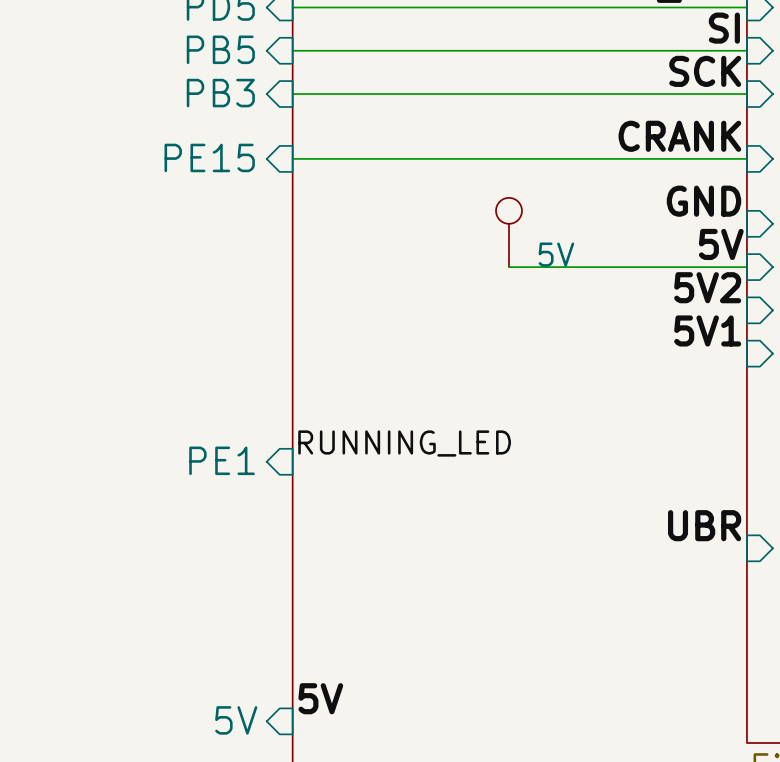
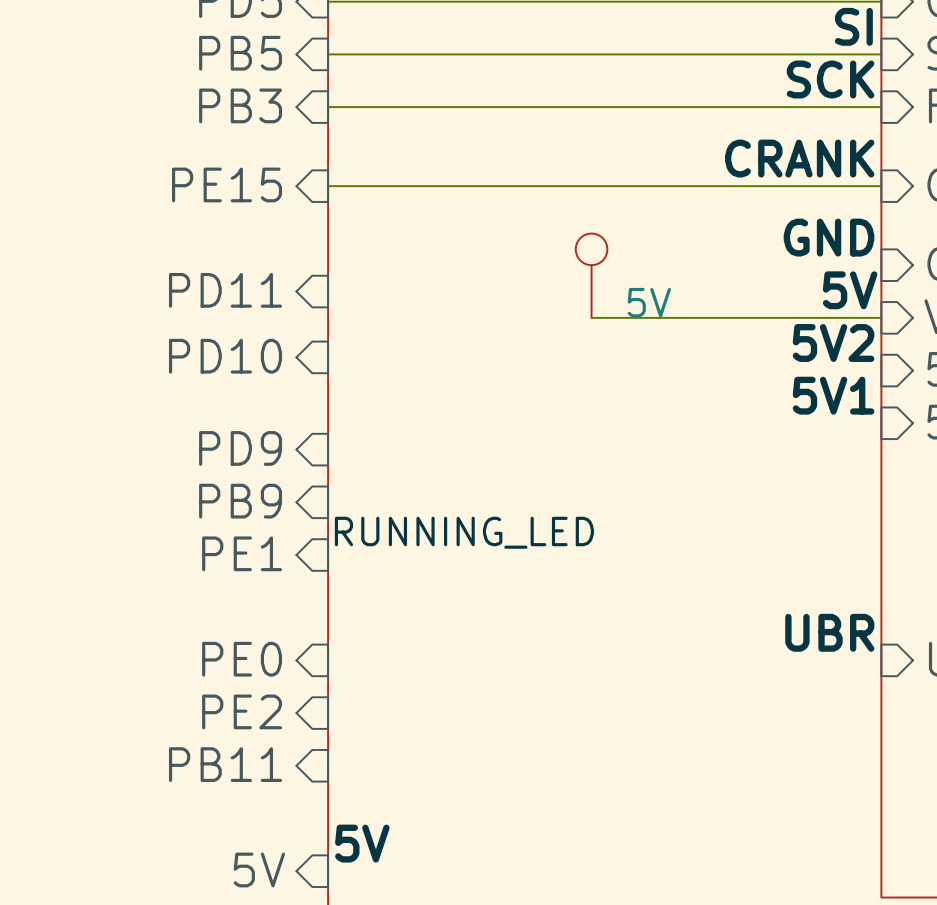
sheet pin: none -> PD11 (225, 290)
sheet pin: none -> PD10 (225, 356)
sheet pin: none -> PD9 (240, 448)
sheet pin: none -> PB9 (240, 501)
sheet pin: none -> PE0 (242, 659)
sheet pin: none -> PE2 (242, 711)
sheet pin: none -> PB11 (225, 764)

